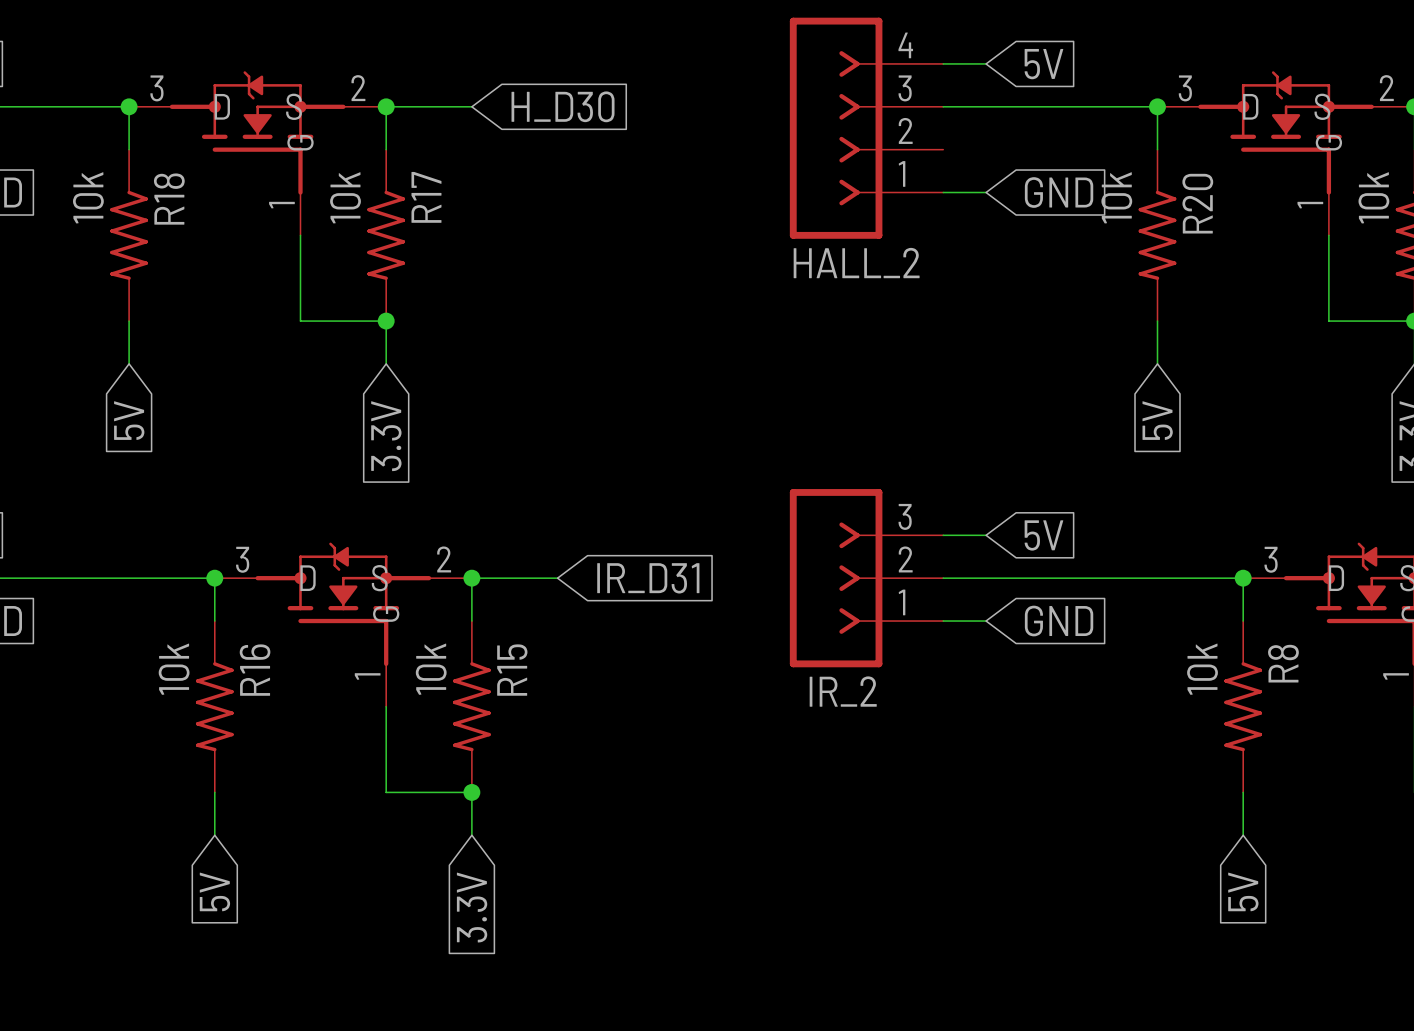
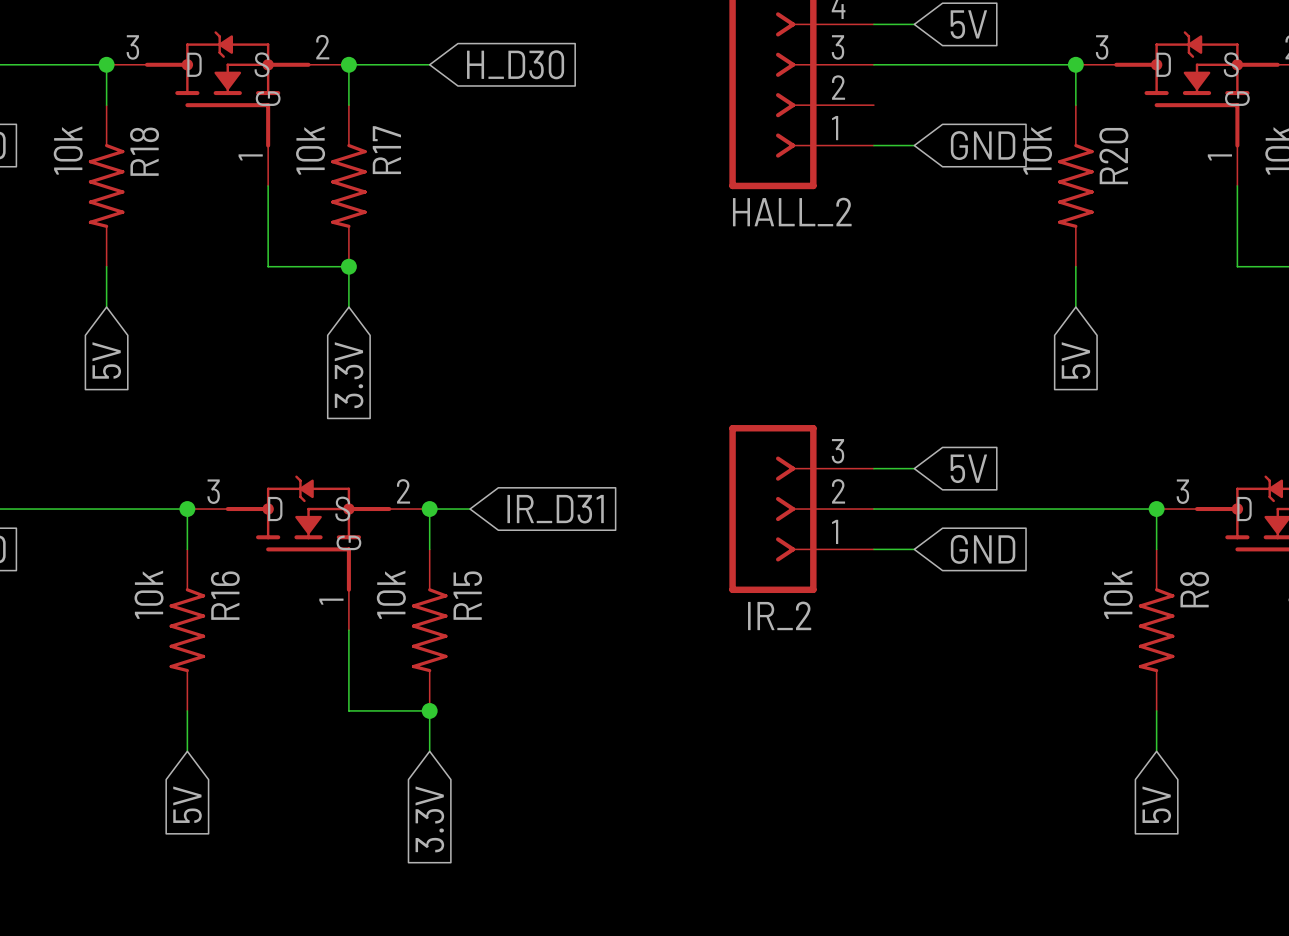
wire: (514, 578) (557, 578) -> none
global label position: IR_D31 (648, 578) -> IR_D31 (555, 509)

